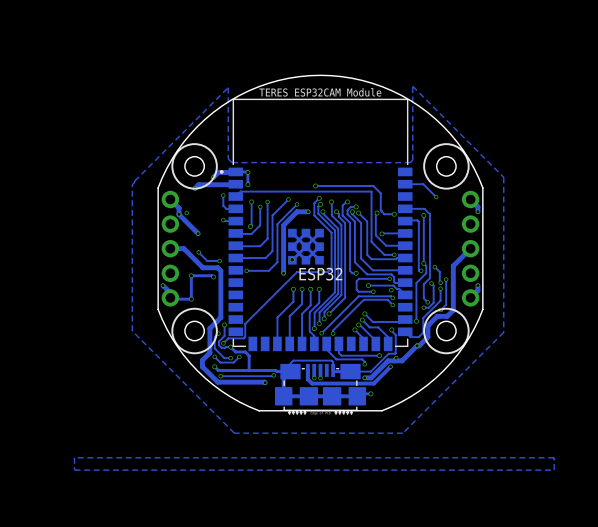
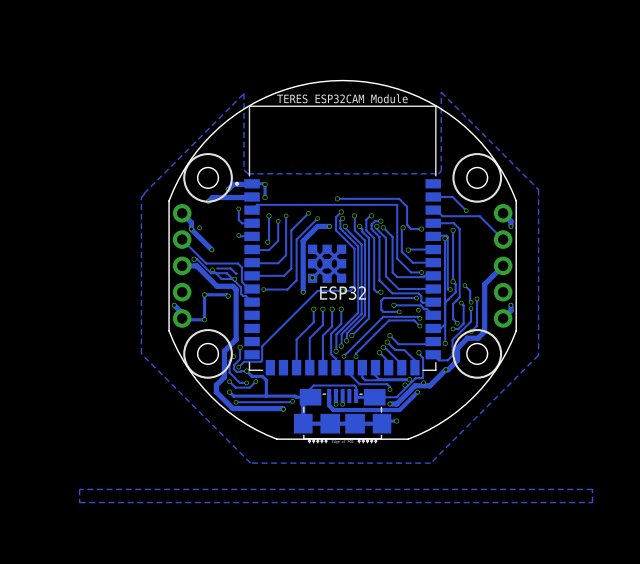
track: none -> (433, 210) (436, 210) (442, 216) (479, 216) (503, 239)
track: none -> (445, 238) (445, 324) (441, 328) (433, 328)
via: none -> (445, 238)
track: none -> (182, 239) (206, 263) (238, 263) (241, 267) (241, 281) (248, 289) (252, 289)
track: none -> (194, 259) (197, 259) (211, 273) (226, 273) (241, 287) (241, 293) (252, 302)
via: none -> (194, 259)
track: none -> (217, 268) (230, 268) (236, 273)
track: none -> (375, 367) (375, 375) (379, 379) (409, 379)
via: (379, 355) -> none
via: none -> (409, 379)
via: none -> (405, 385)

